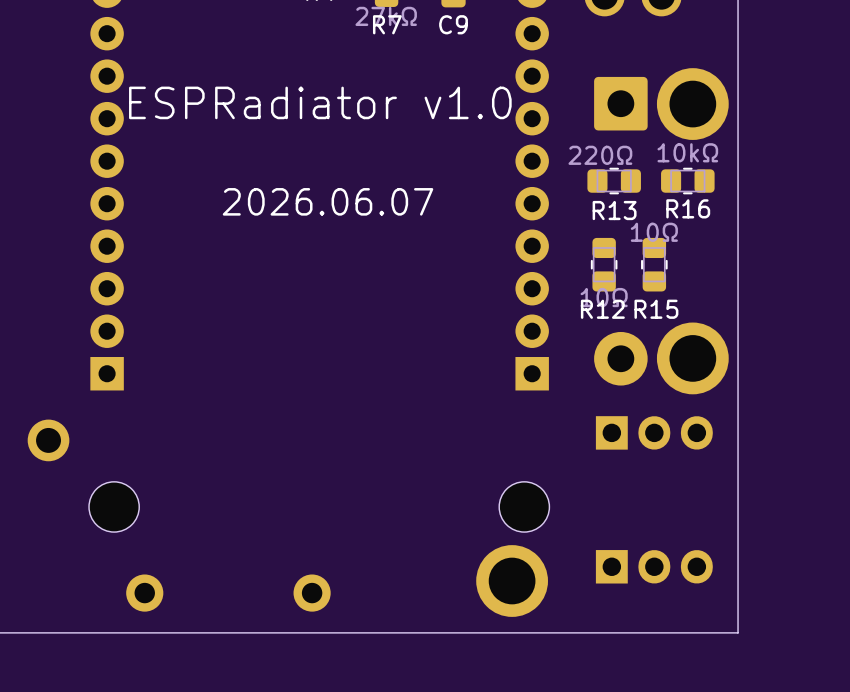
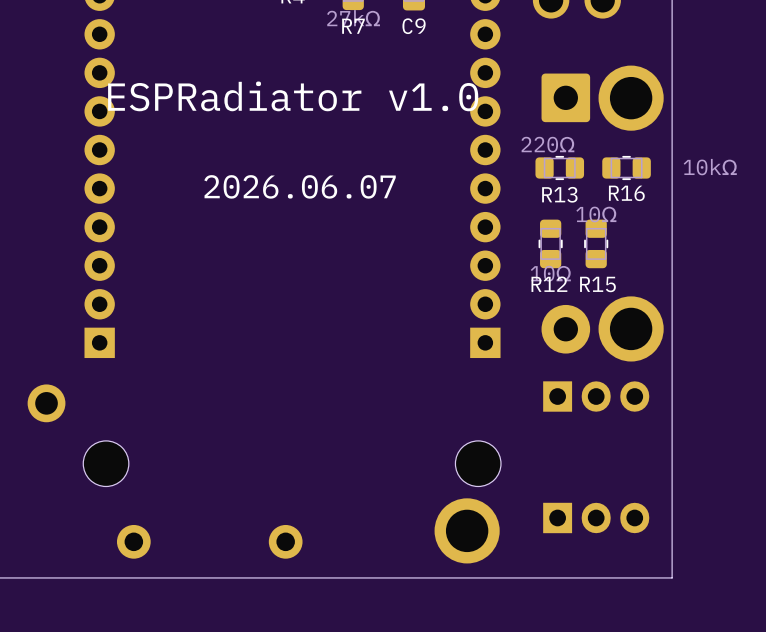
R16 value position: 10kΩ (687, 152) -> 10kΩ (710, 167)

